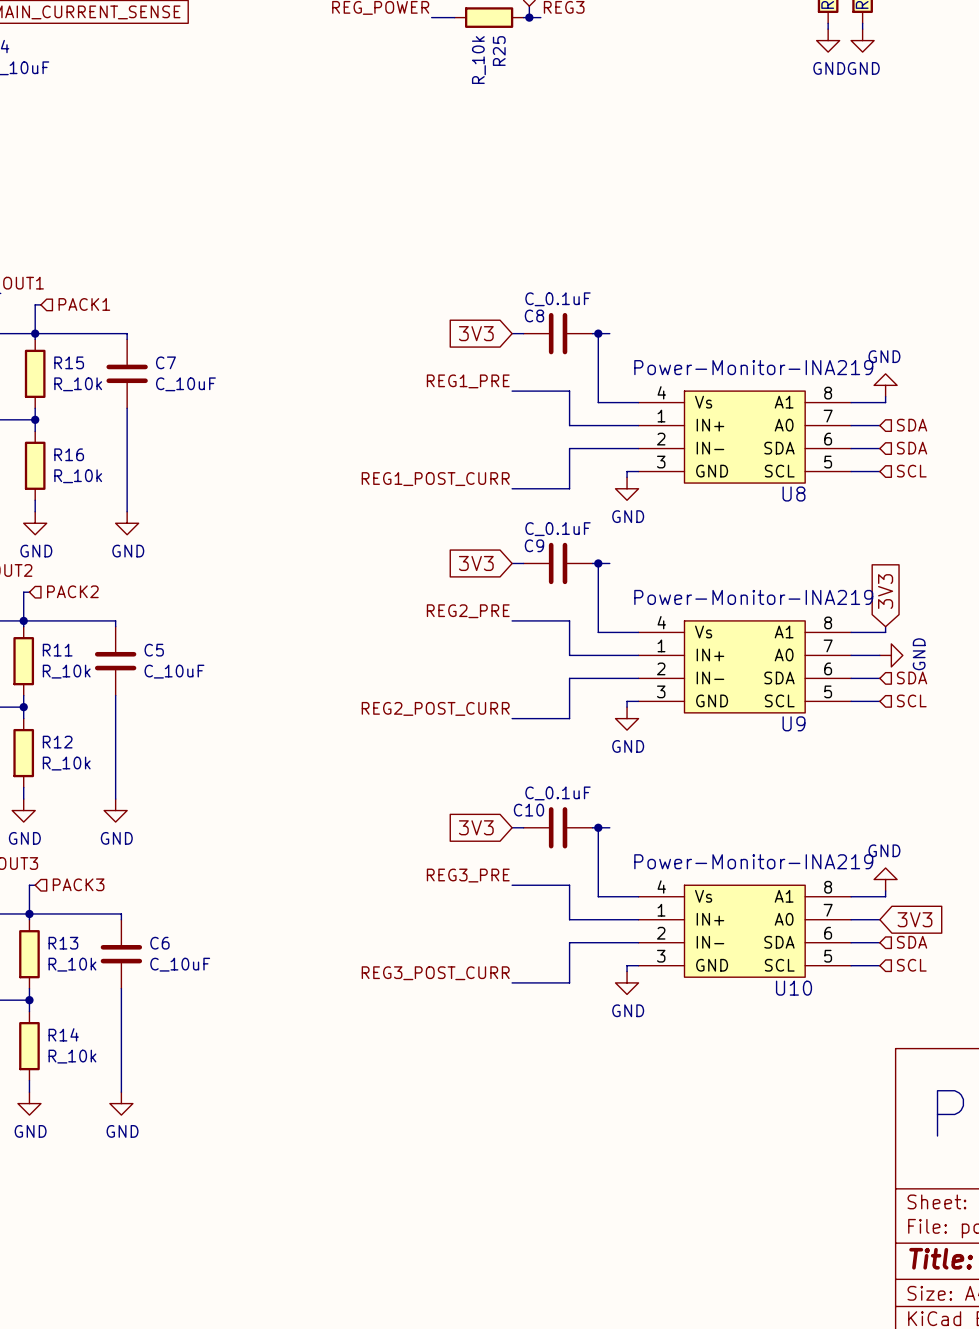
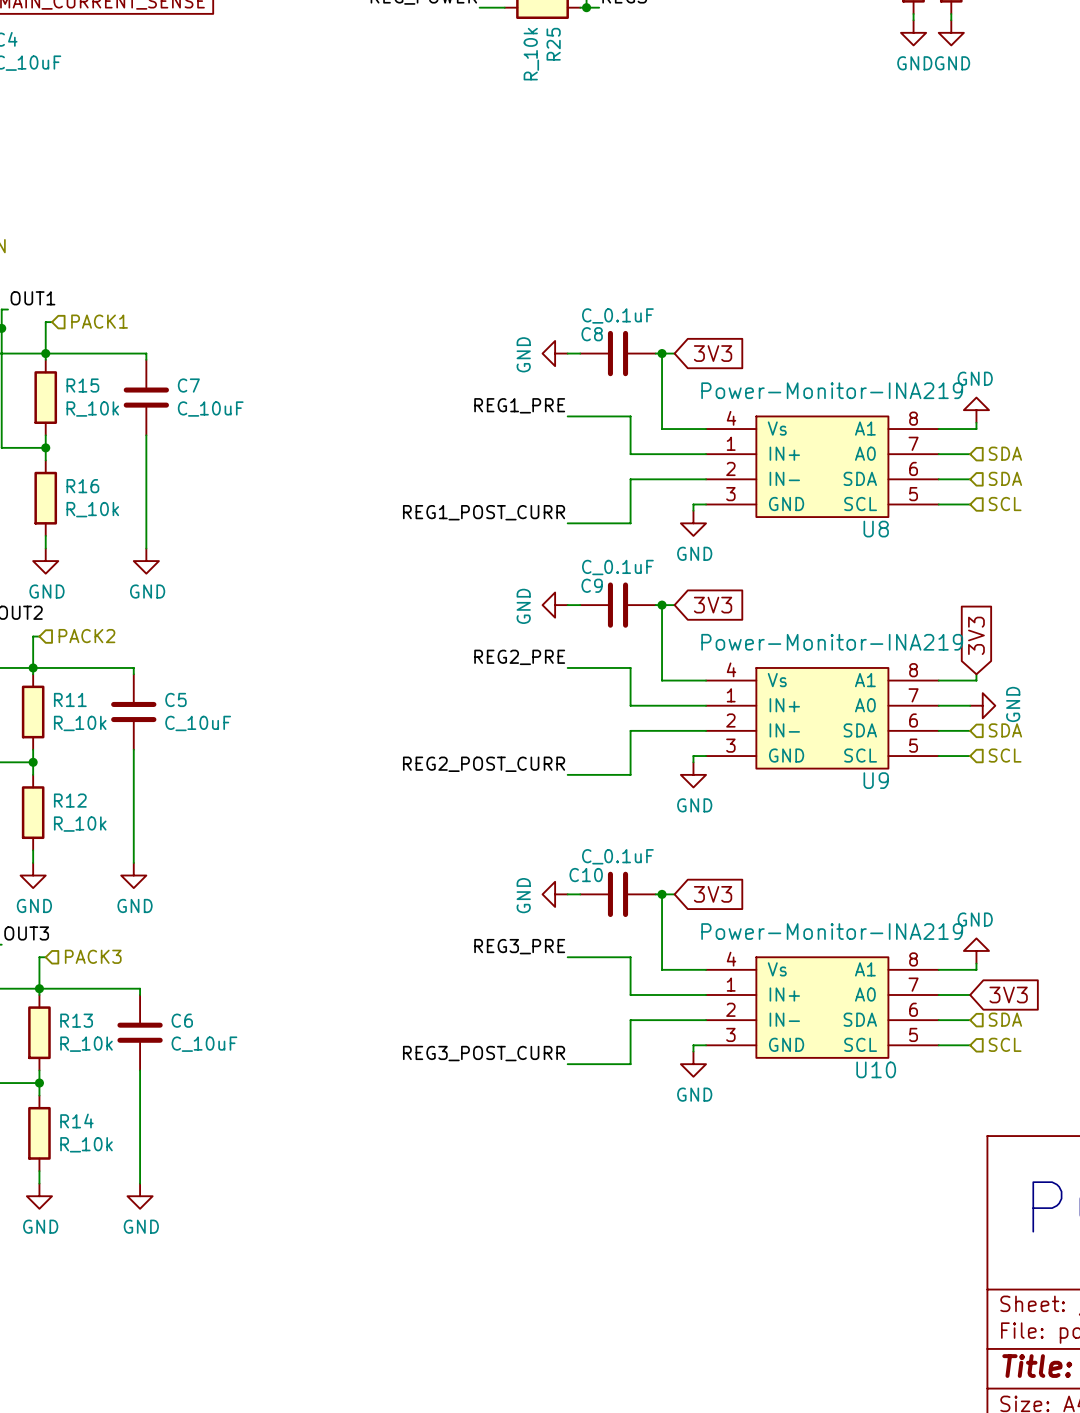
global label rotation: 0° (476, 333) -> 180° (713, 353)
global label position: 3V3 (476, 333) -> 3V3 (713, 353)
power symbol: none -> GND (555, 353)
global label rotation: 0° (476, 563) -> 180° (713, 605)
global label position: 3V3 (476, 563) -> 3V3 (713, 605)
power symbol: none -> GND (555, 605)
global label rotation: 0° (476, 827) -> 180° (713, 894)
global label position: 3V3 (476, 827) -> 3V3 (713, 894)
power symbol: none -> GND (555, 894)

